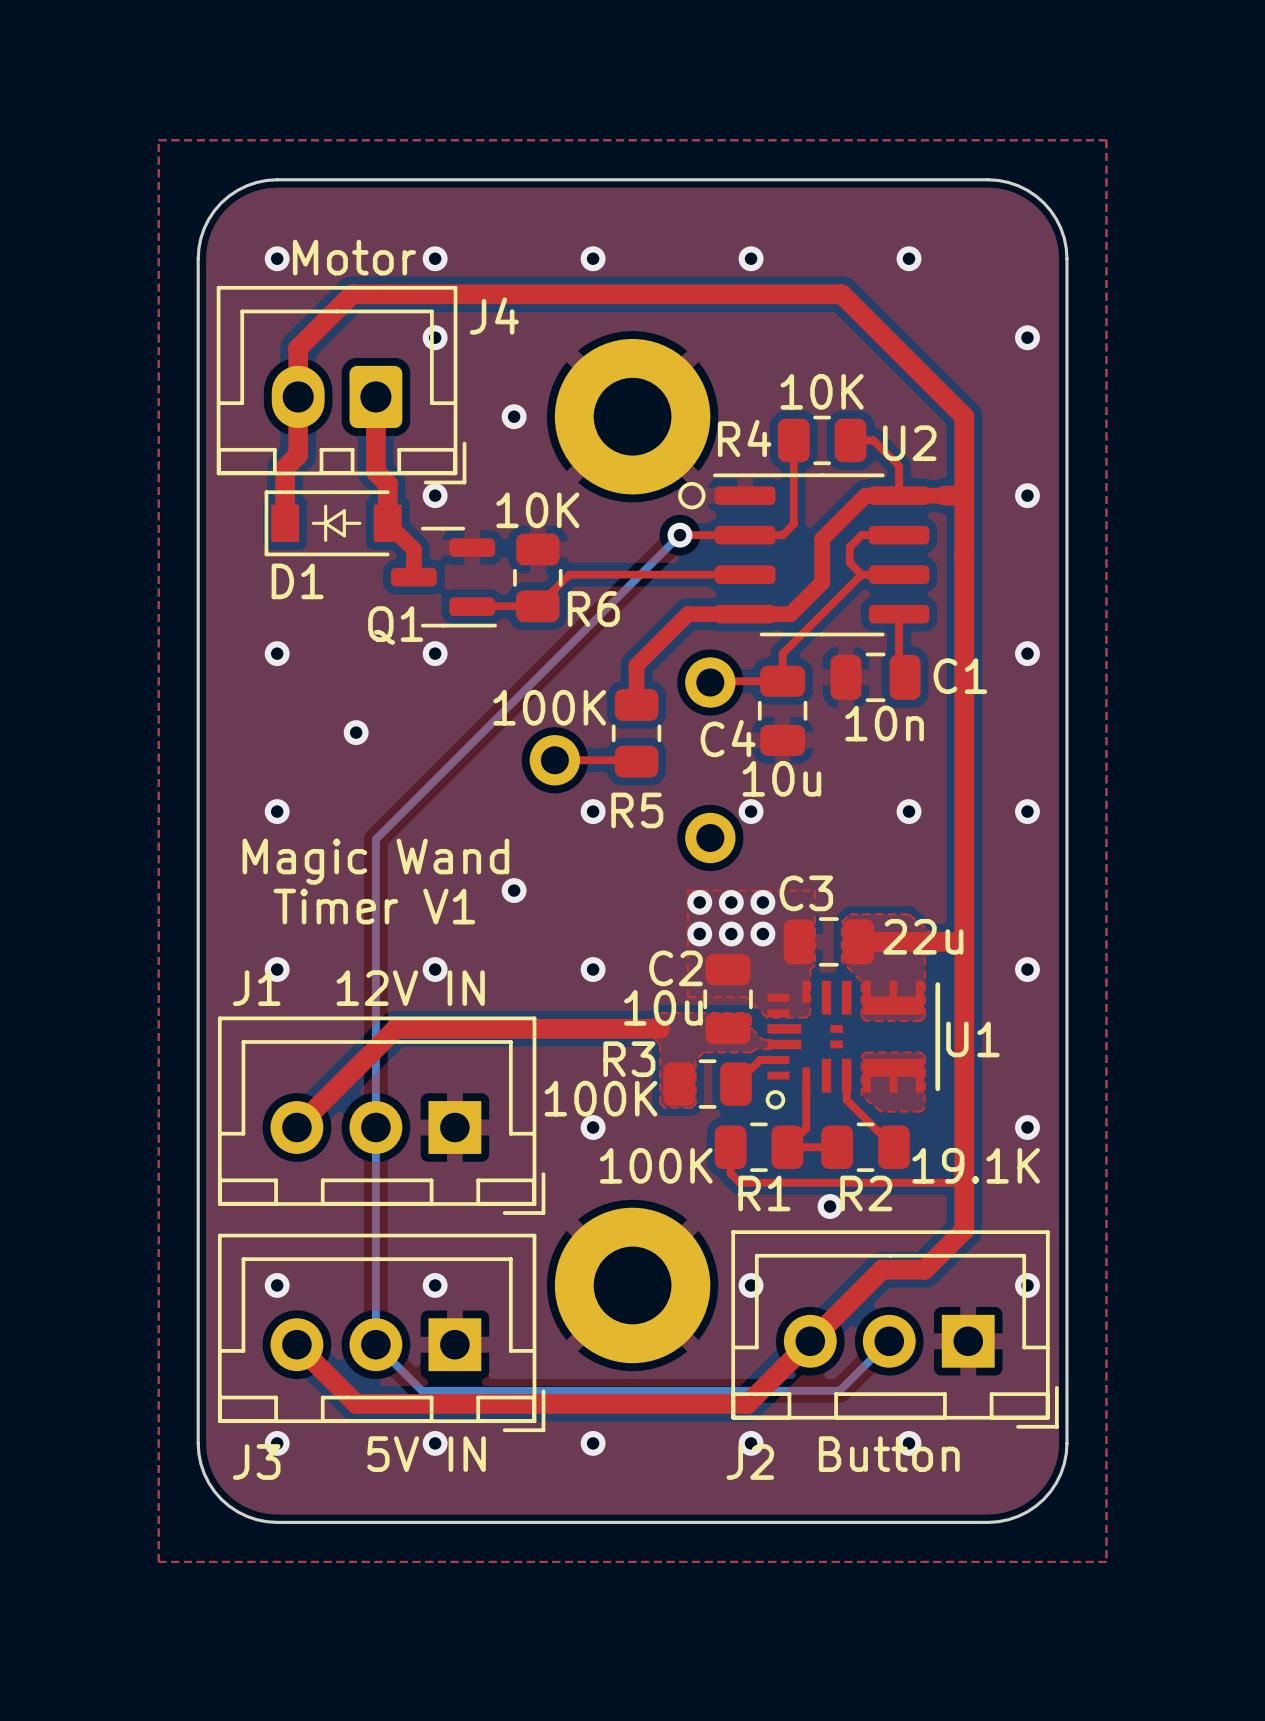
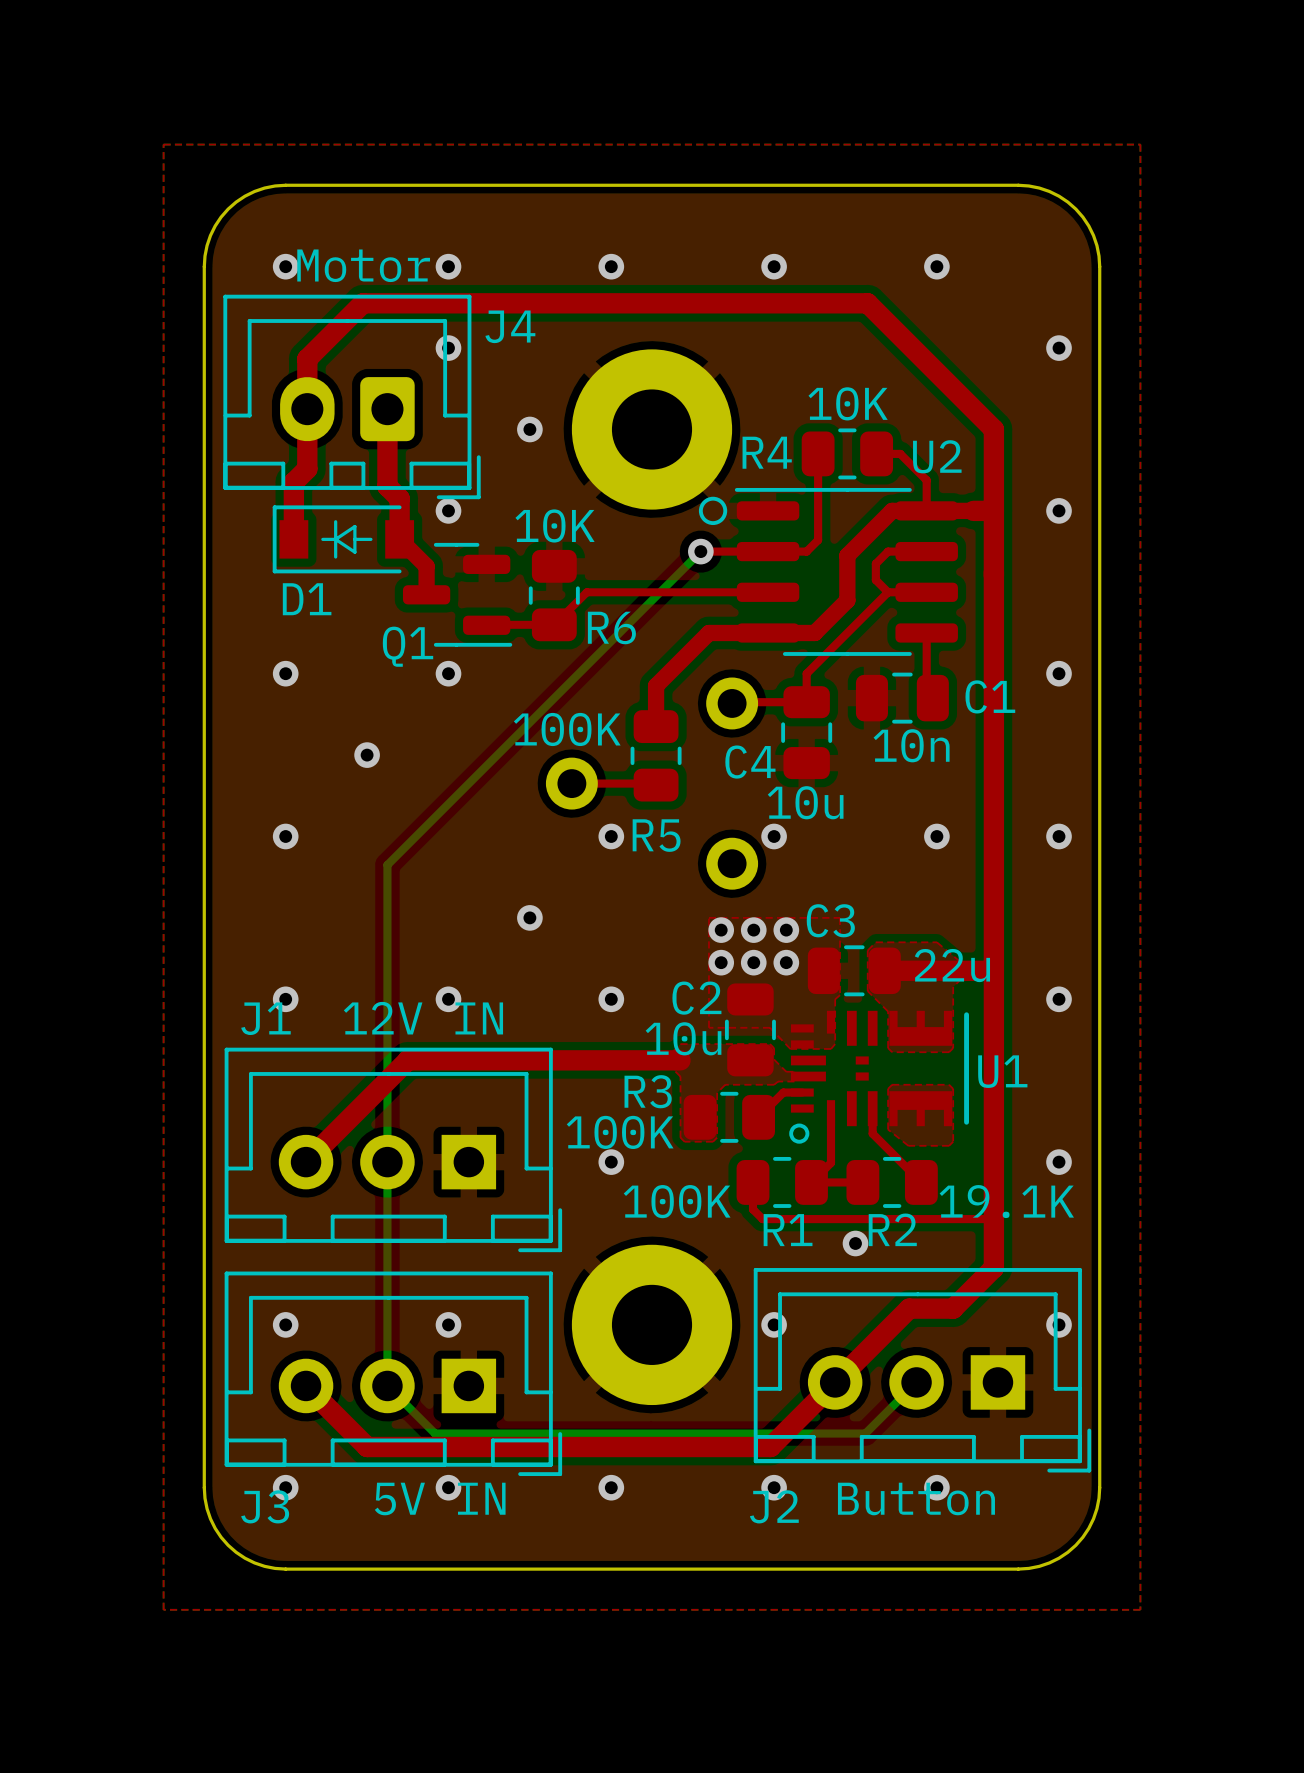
text: Magic Wand (375, 861) -> none
text: Timer V1 (374, 906) -> none

